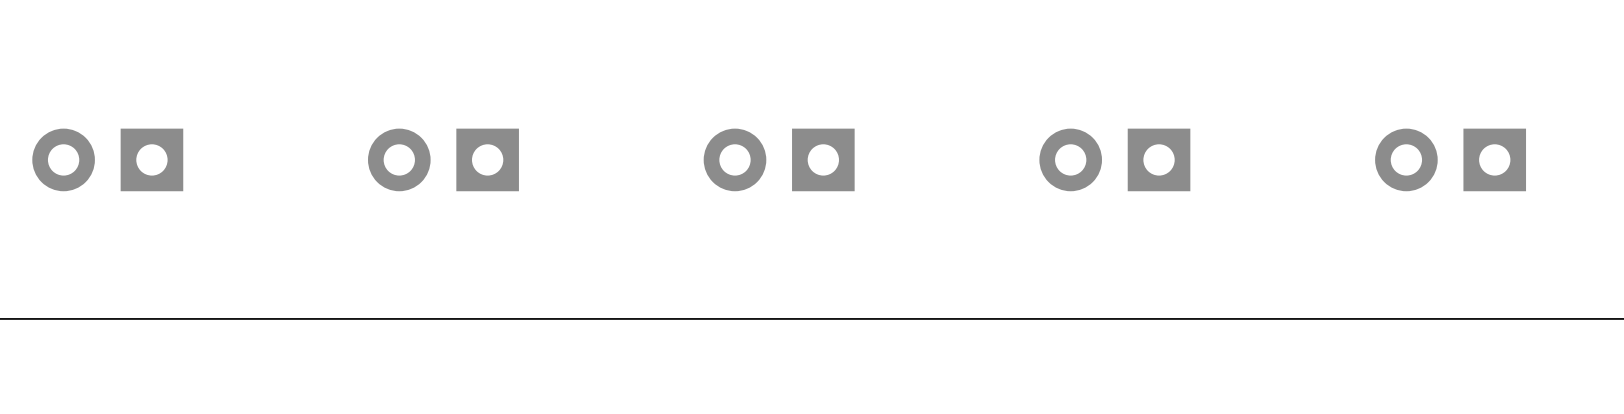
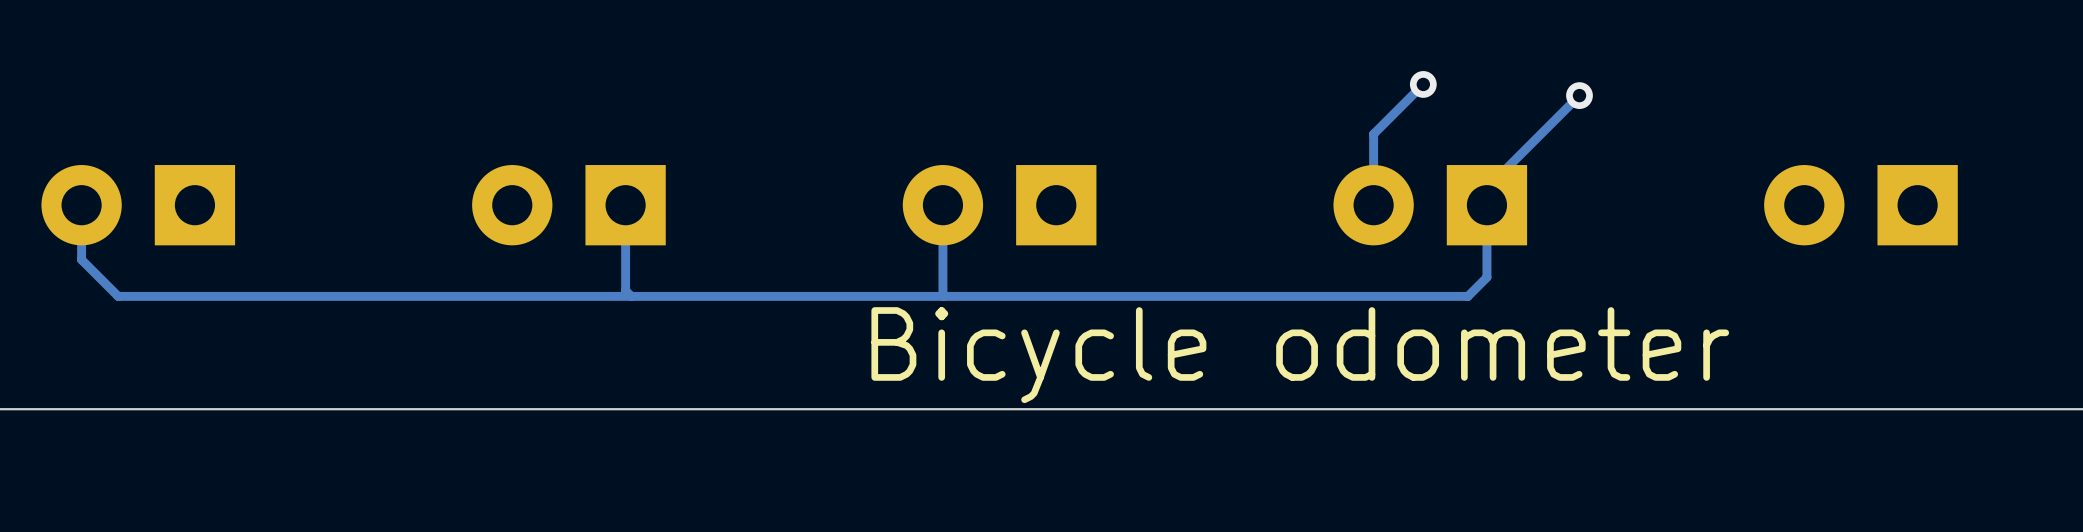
track: none -> (1423, 84) (1373, 134) (1373, 205)
via: none -> (1423, 84)
track: none -> (1579, 95) (1486, 188) (1486, 277) (1467, 296) (118, 296) (81, 259) (81, 205)
via: none -> (1579, 95)
track: none -> (625, 205) (625, 290) (631, 296)
track: none -> (942, 205) (943, 296)
text: none -> Bicycle odometer (1300, 355)

